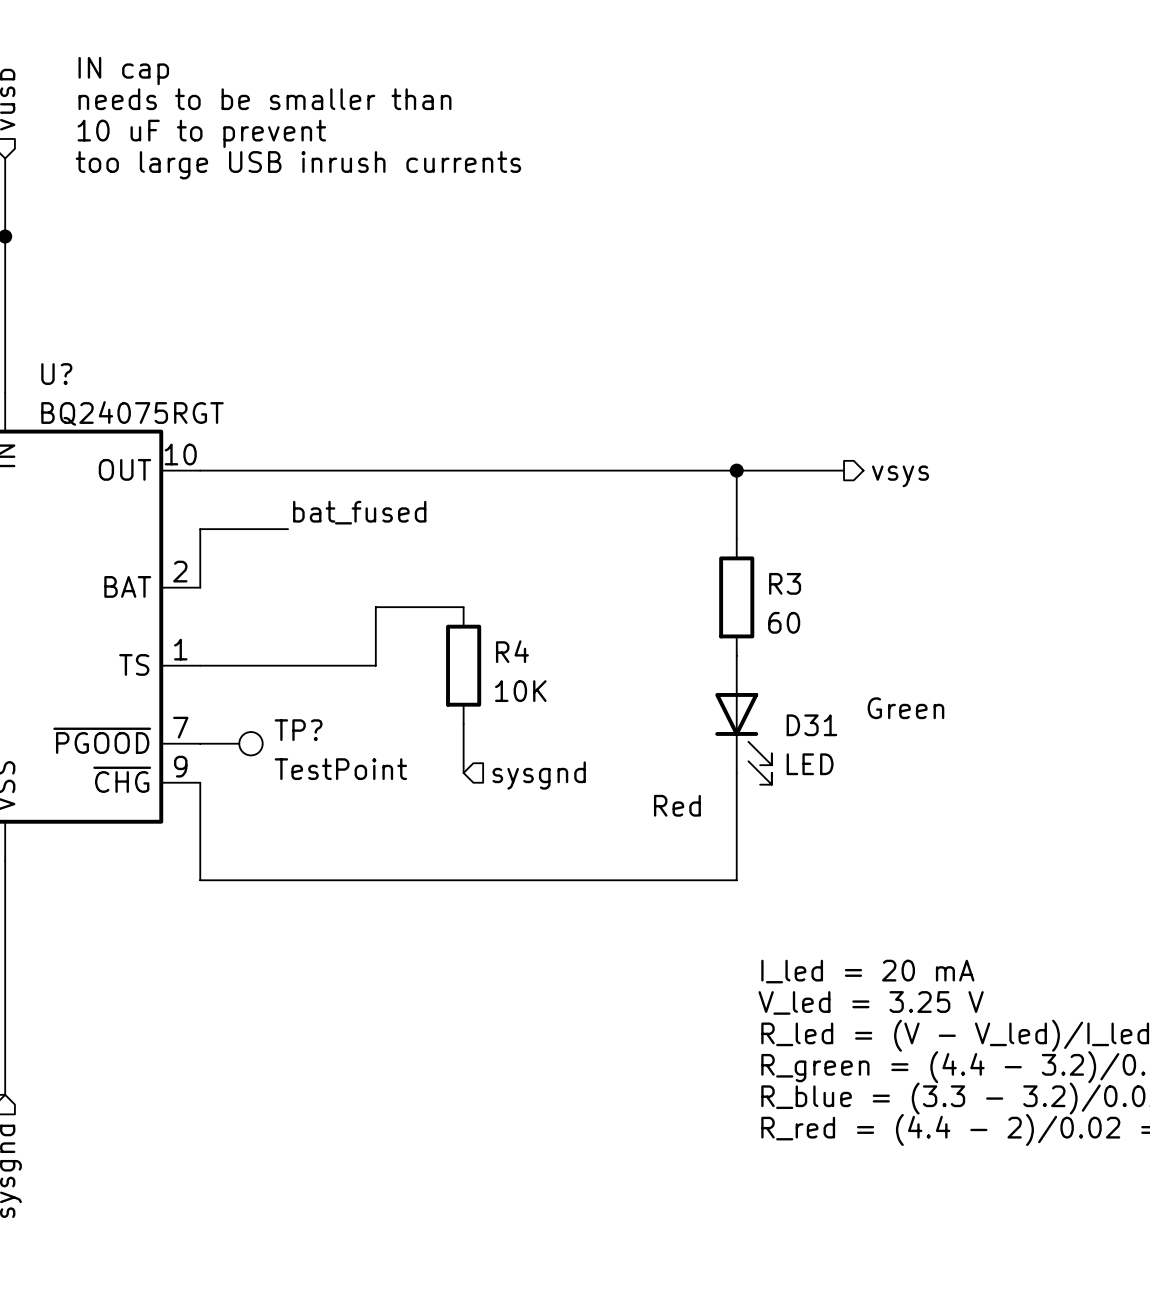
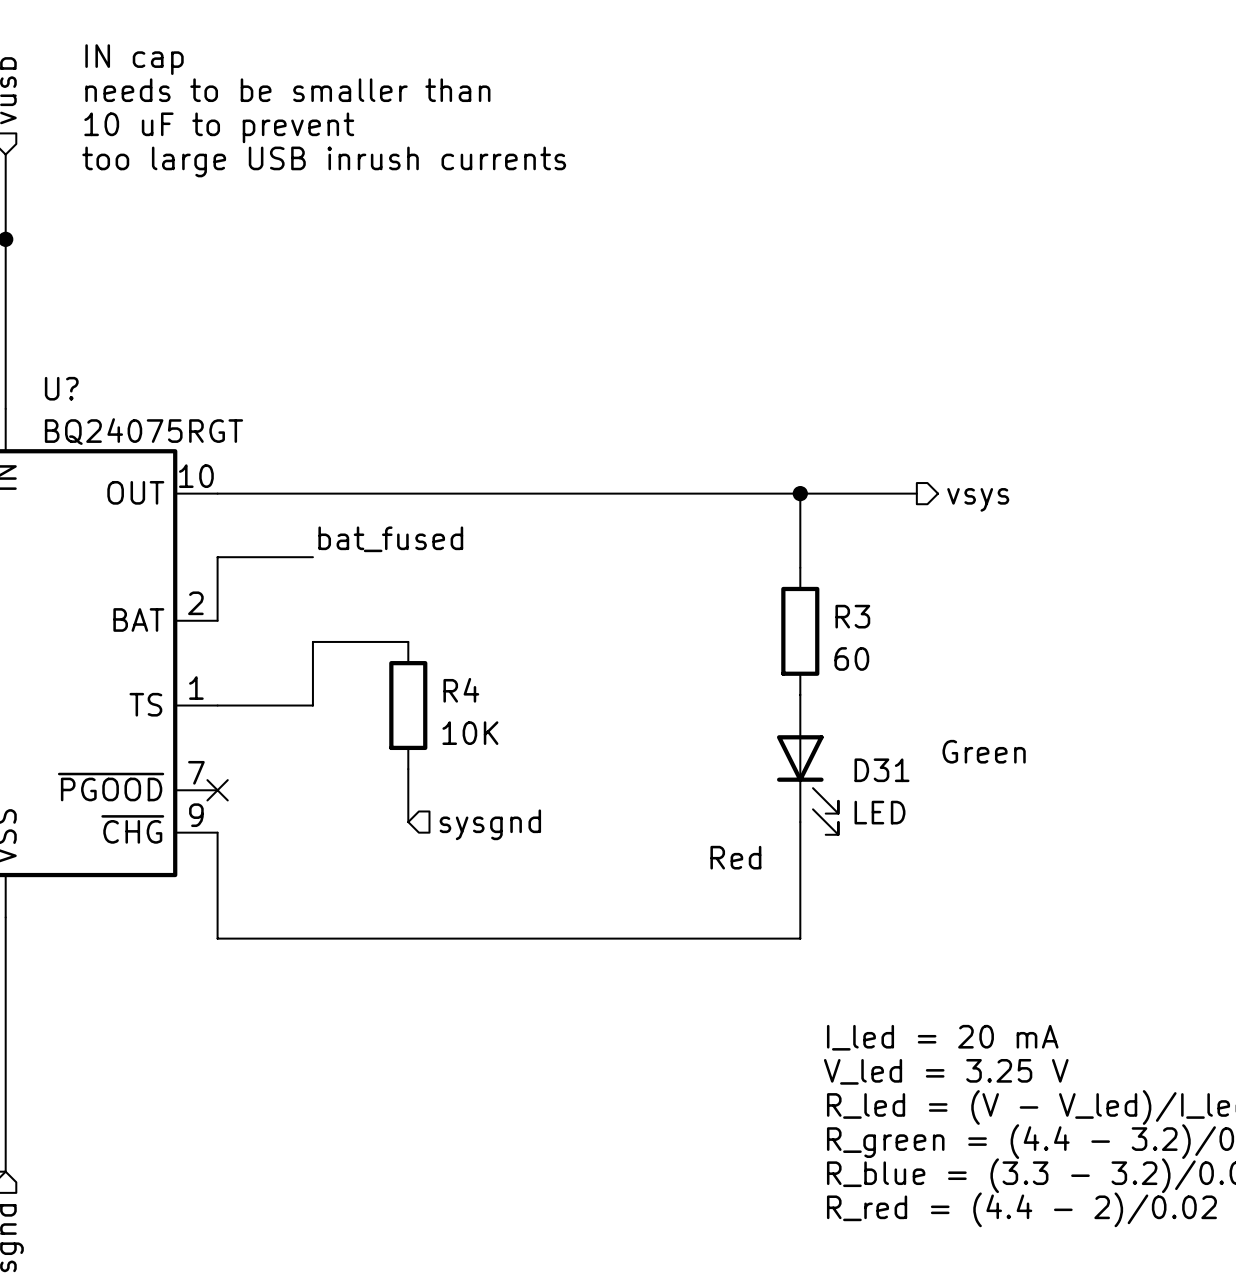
wire: (463, 607) (375, 607) (375, 665) (288, 665) -> (408, 641) (312, 641) (312, 705)
R4 position: (463, 665) -> (408, 705)
wire: (463, 724) (463, 772) -> (408, 769) (408, 822)
no-connect mark: none -> (217, 790)
TP?: TestPoint (231, 743) -> none
hierarchical label position: sysgnd (539, 775) -> sysgnd (490, 824)

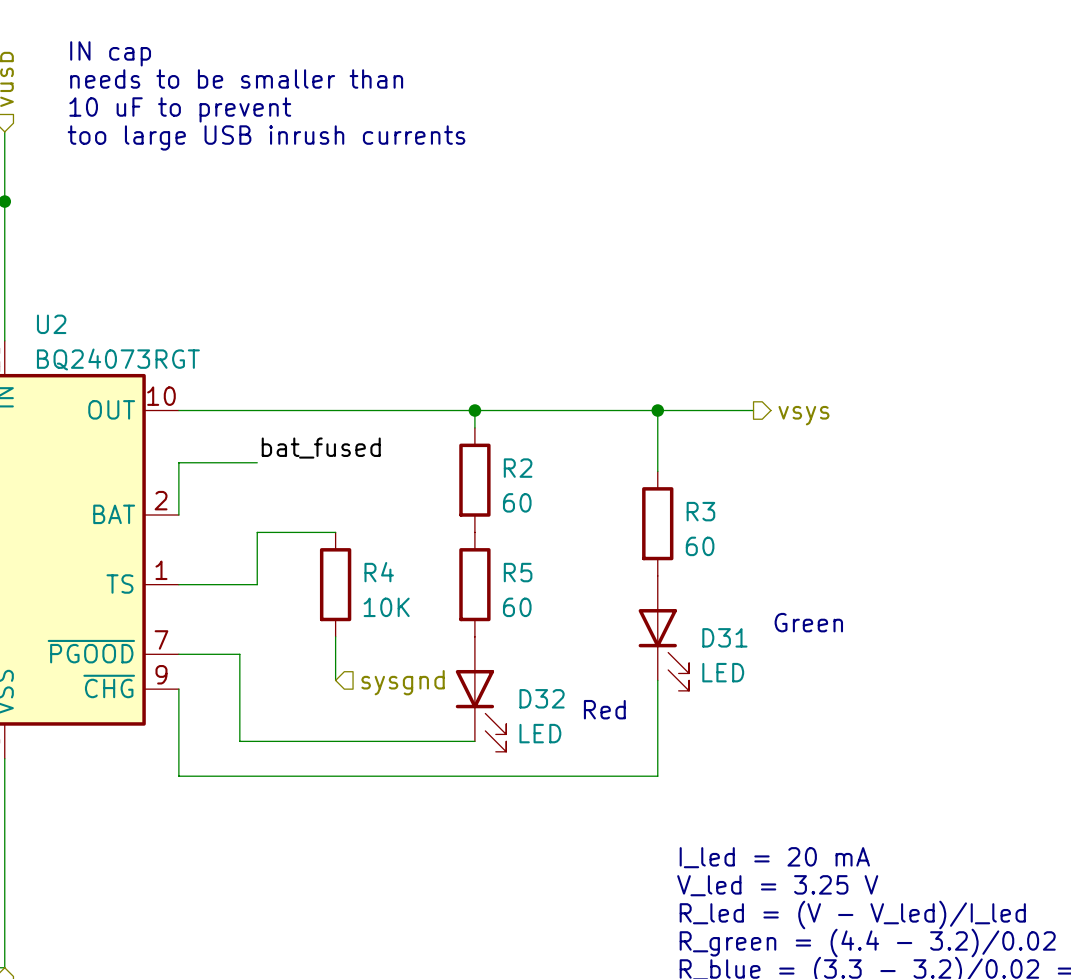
U? name: U? (61, 388) -> U2 (51, 324)
U? value: BQ24075RGT (143, 431) -> BQ24073RGT (118, 359)
wire: none -> (474, 410) (474, 427)
junction: none -> (474, 410)
R2: none -> 60 (474, 480)
R5: none -> 60 (474, 584)
wire: none -> (178, 654) (239, 654) (239, 741) (474, 741)
no-connect mark: (217, 790) -> none
D32: none -> LED (481, 694)

